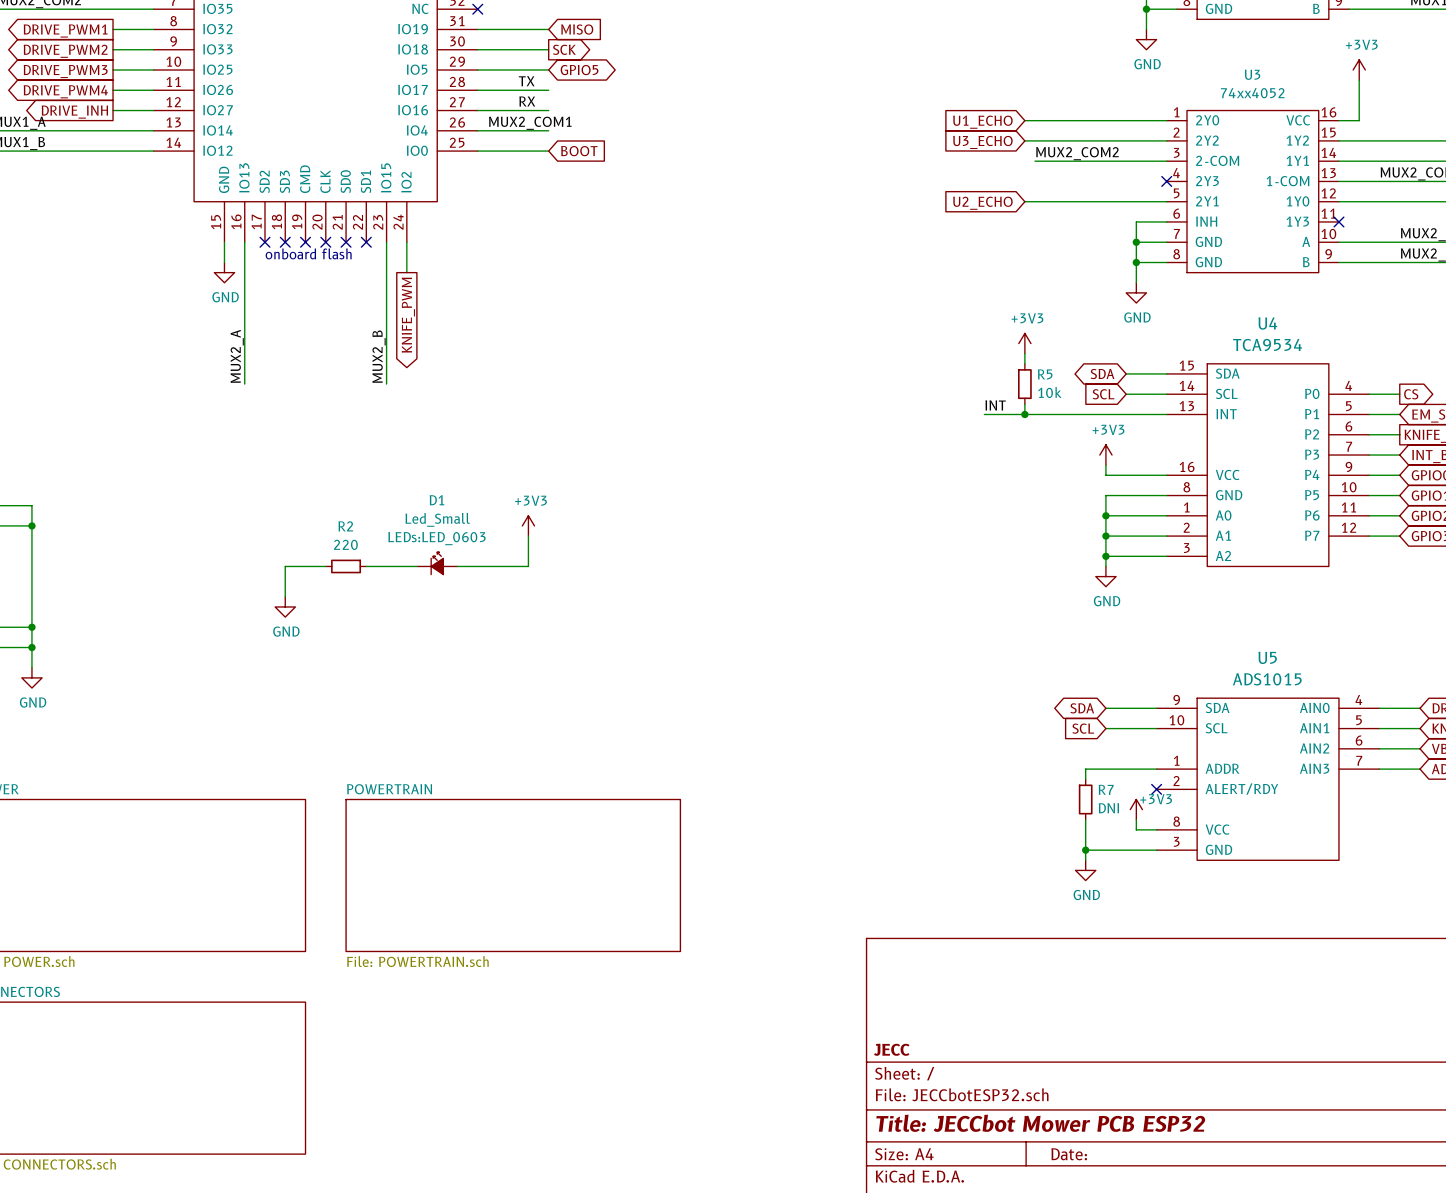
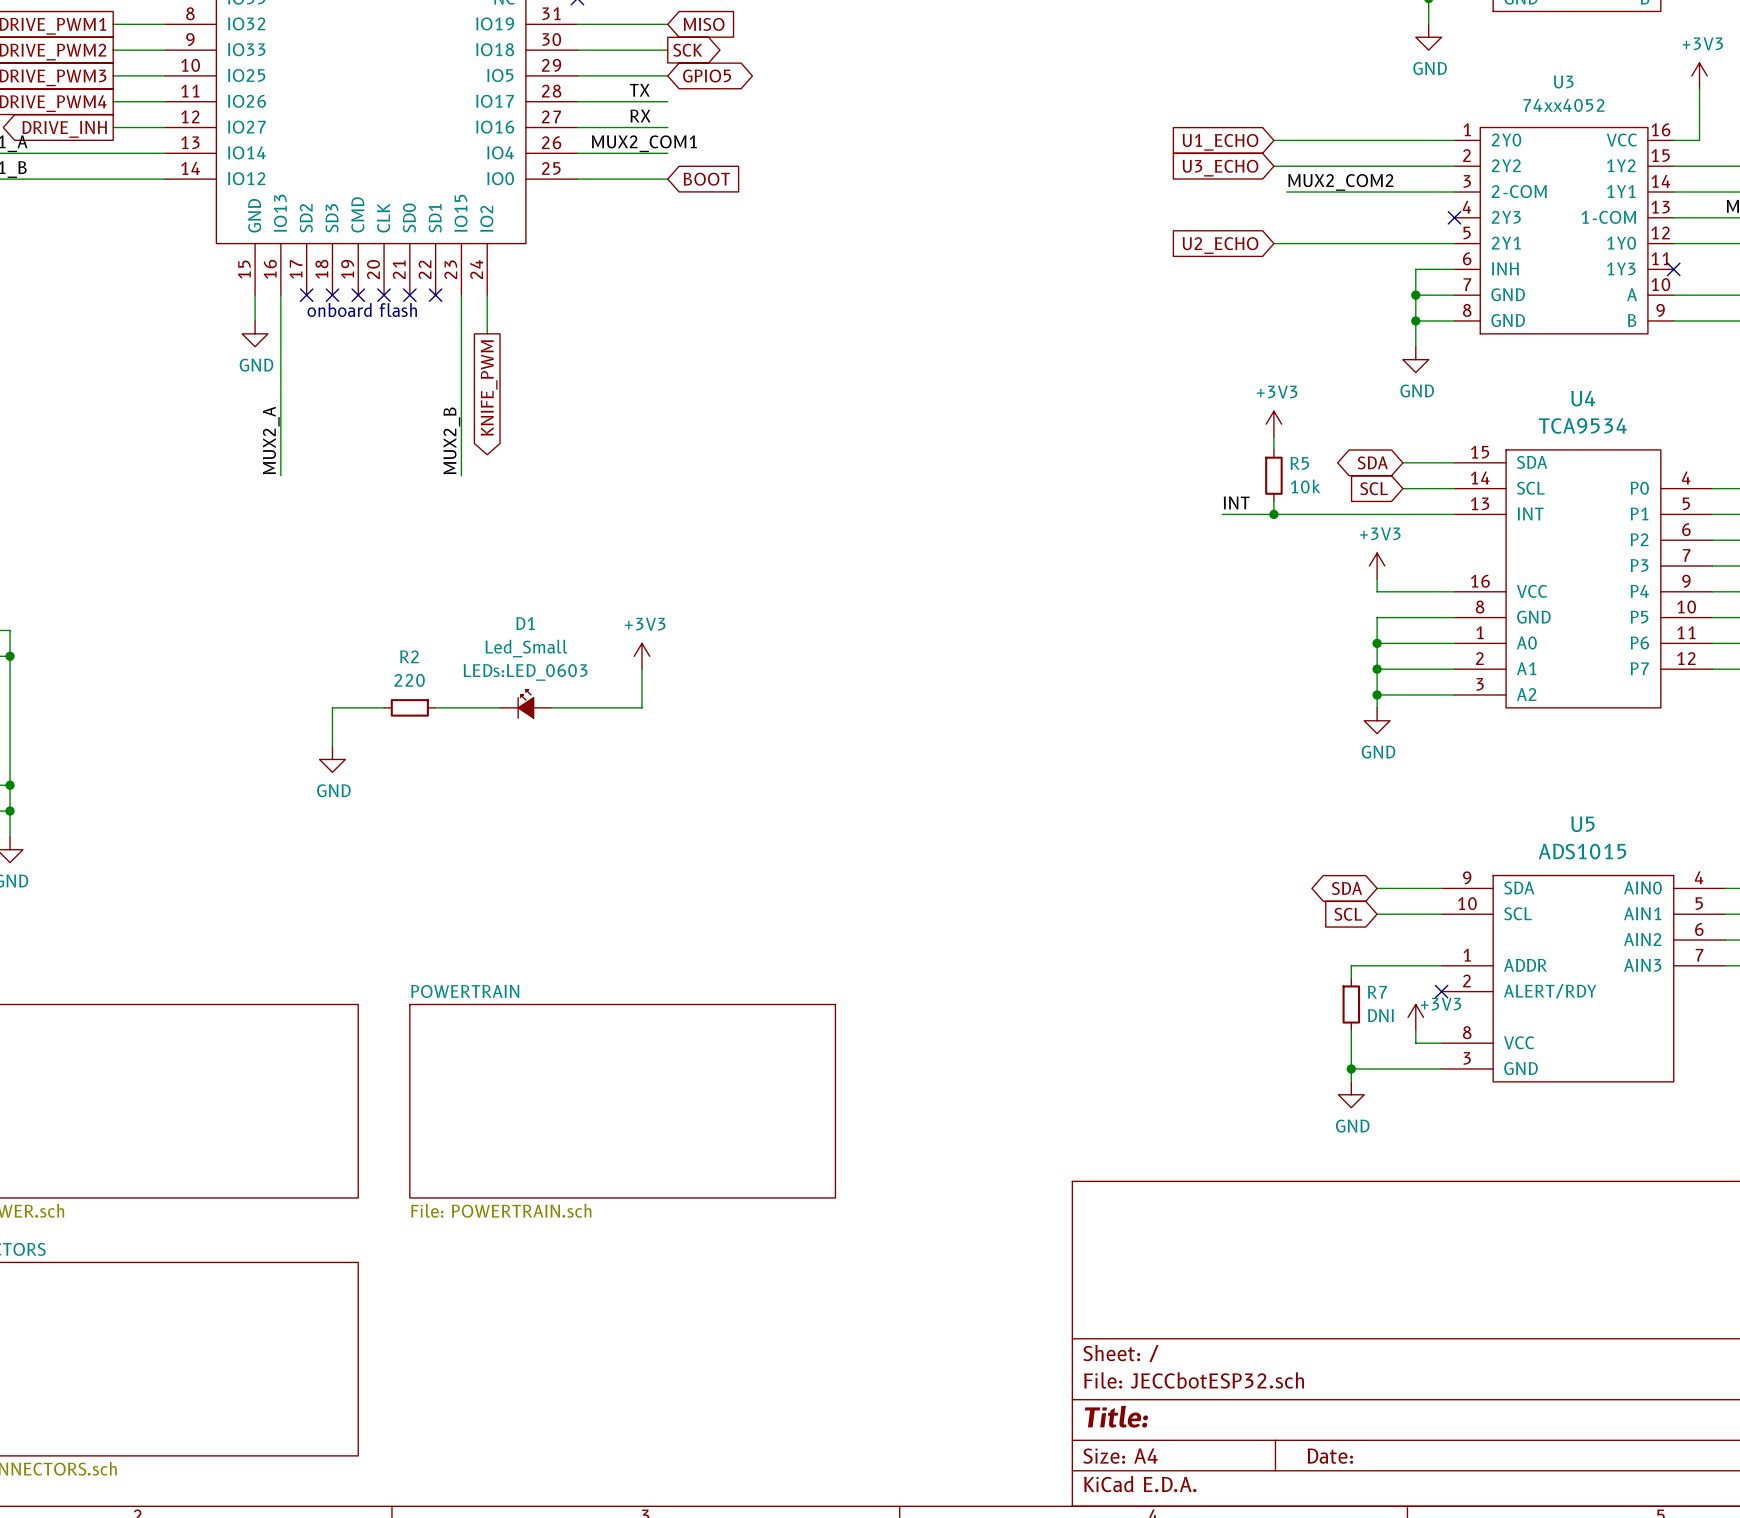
title block: JECC (891, 1049) -> none
title block: Title: JECCbot Mower PCB ESP32 (1040, 1123) -> Title: (1116, 1416)

